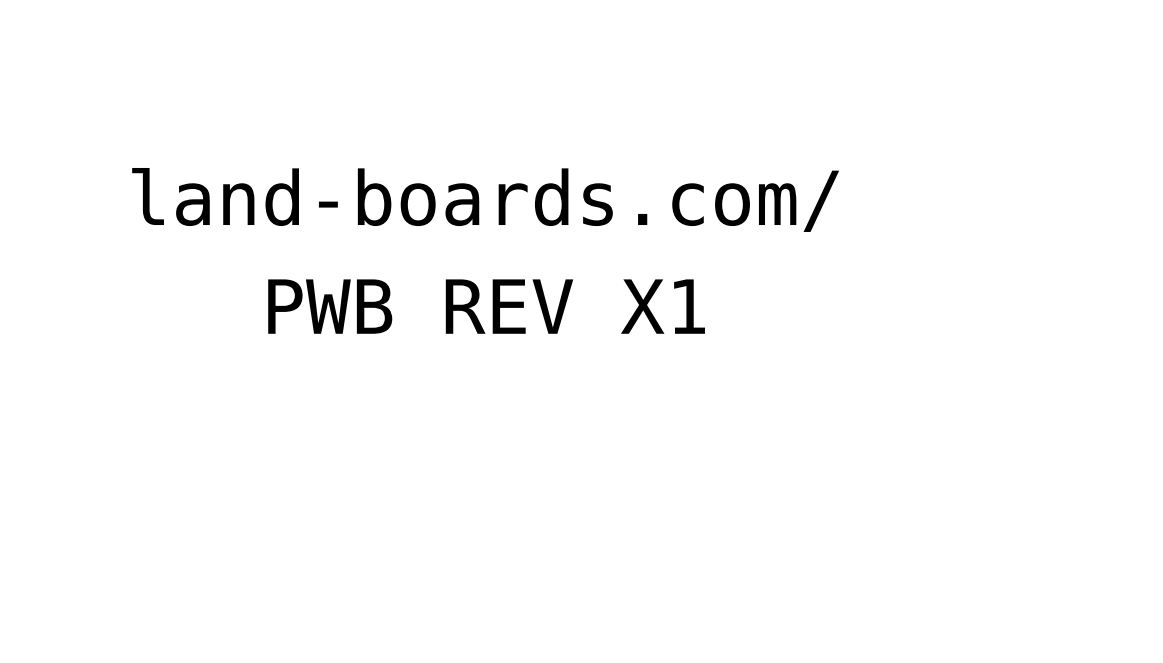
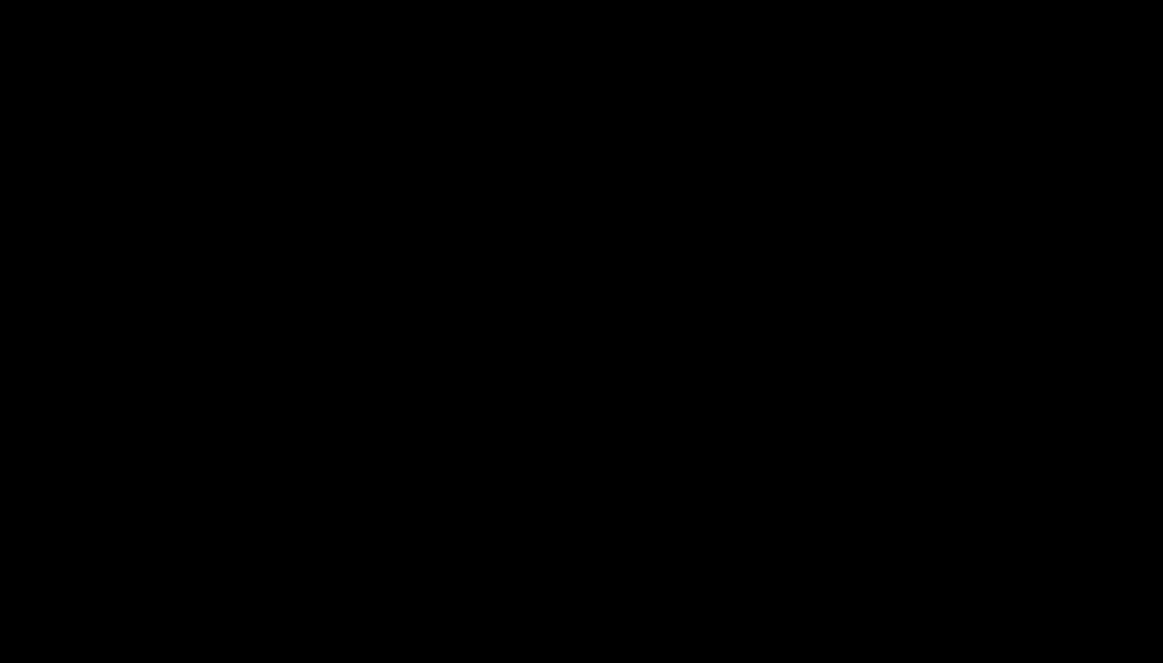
text: land-boards.com/ (485, 199) -> none
text: PWB REV X1 (486, 306) -> none

